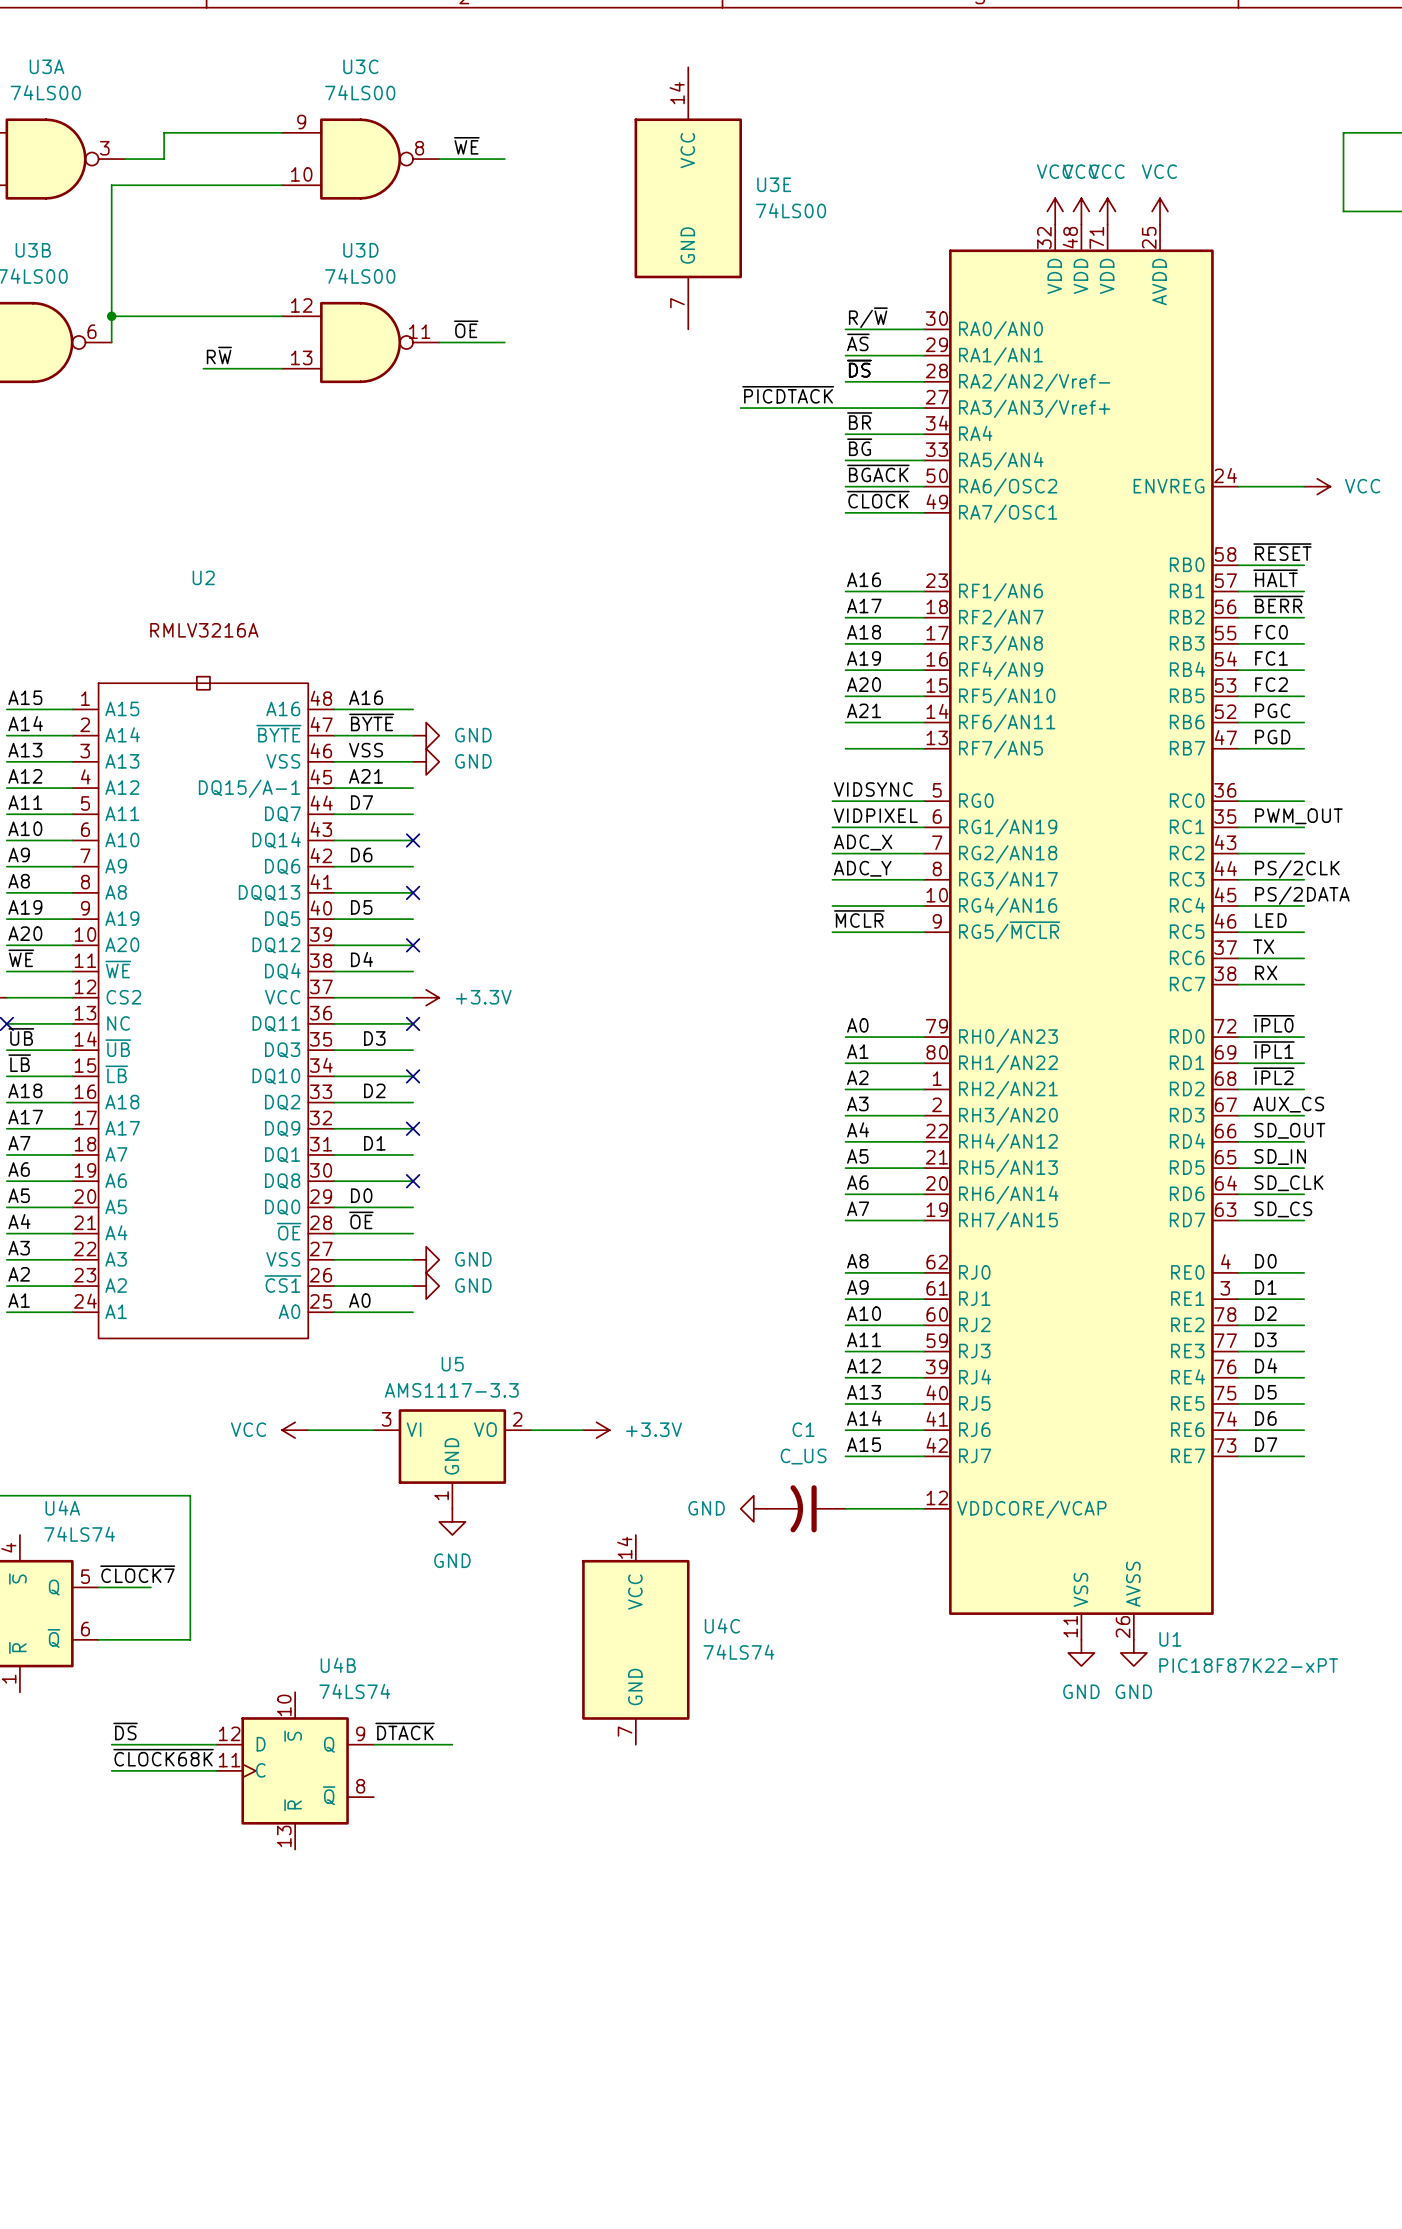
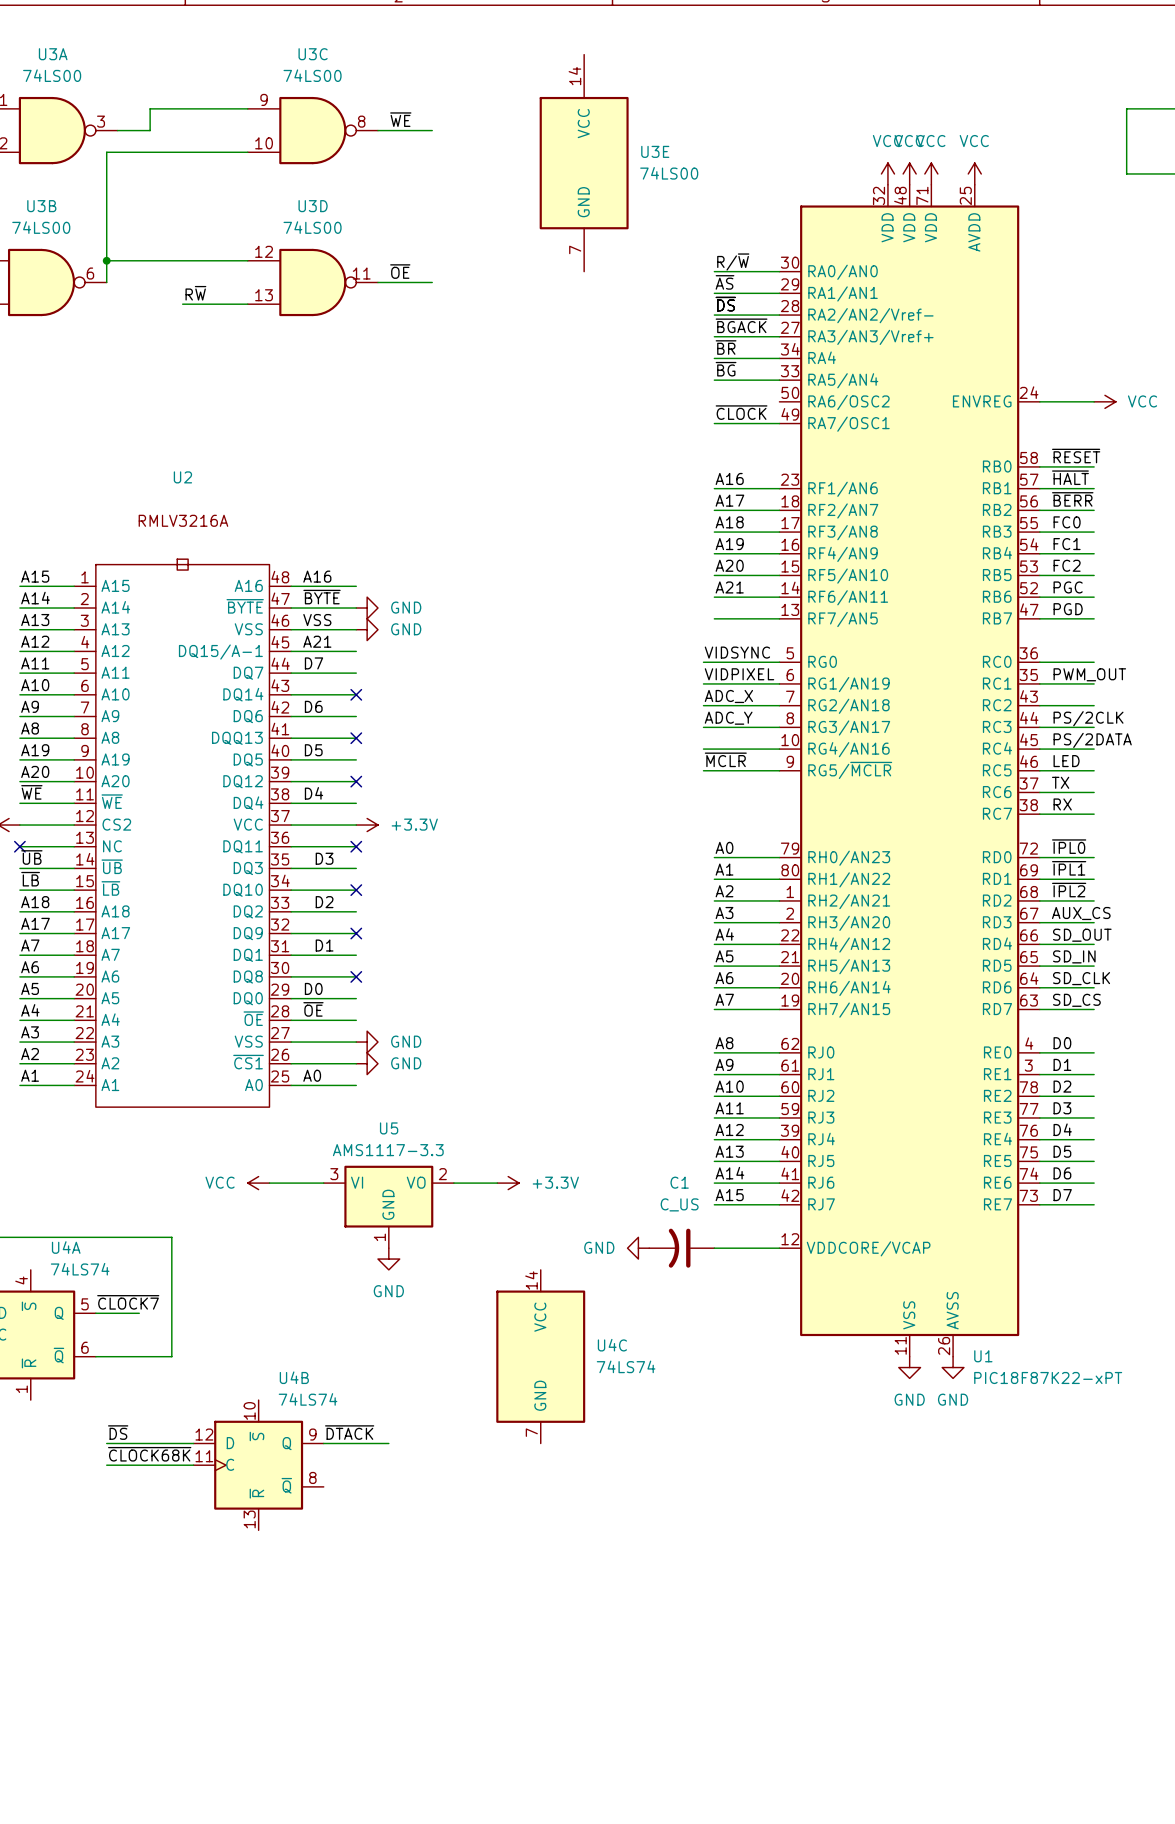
label: ~{PICDTACK} (788, 394) -> none
wire: (740, 408) (845, 408) -> none
label position: ~{BGACK} (878, 473) -> ~{BGACK} (741, 325)
wire: (845, 486) (924, 486) -> none

